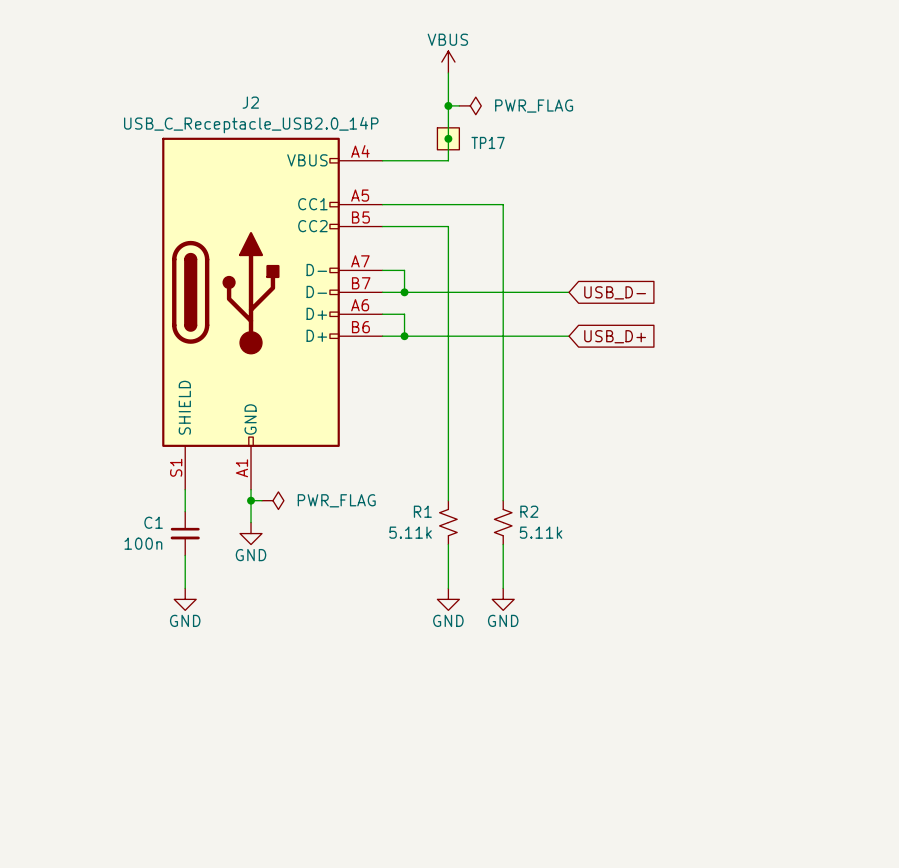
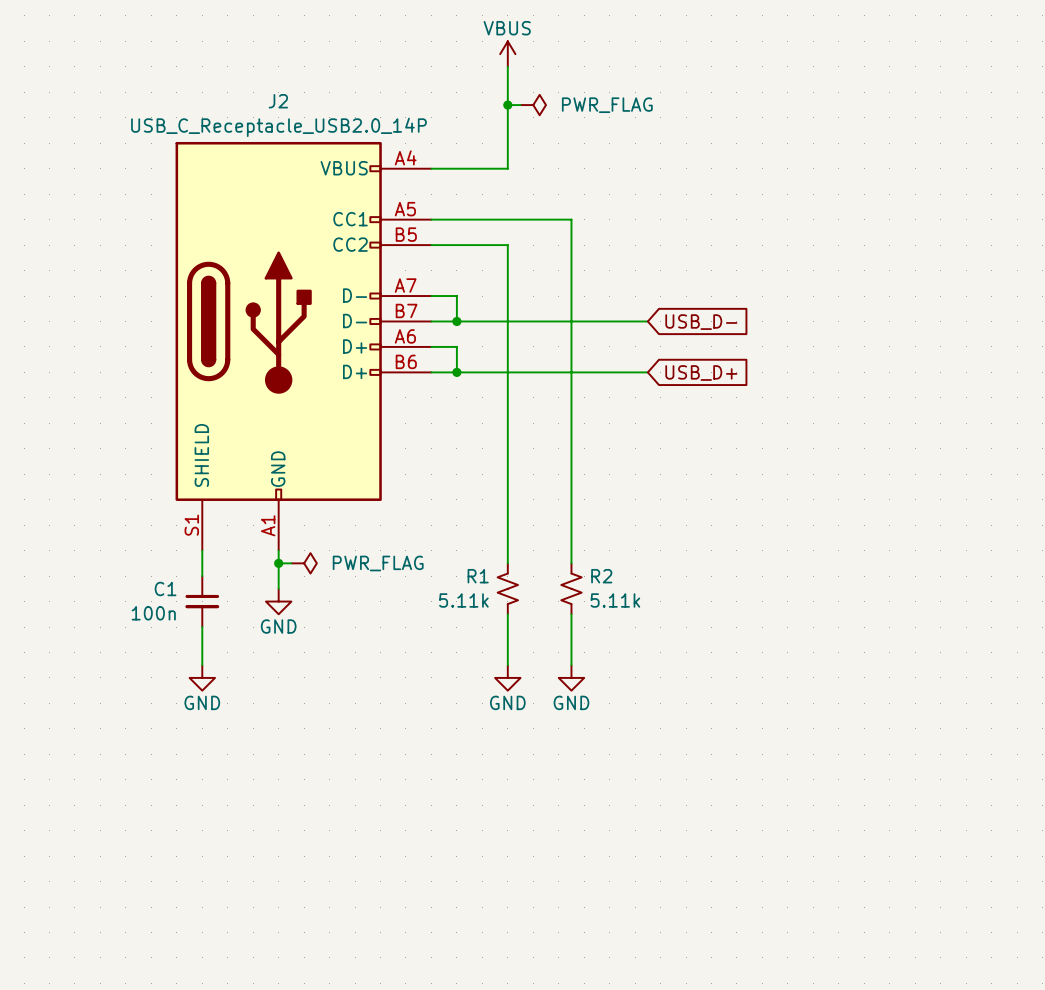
junction: (448, 138) -> none
TP17: (448, 138) -> none

